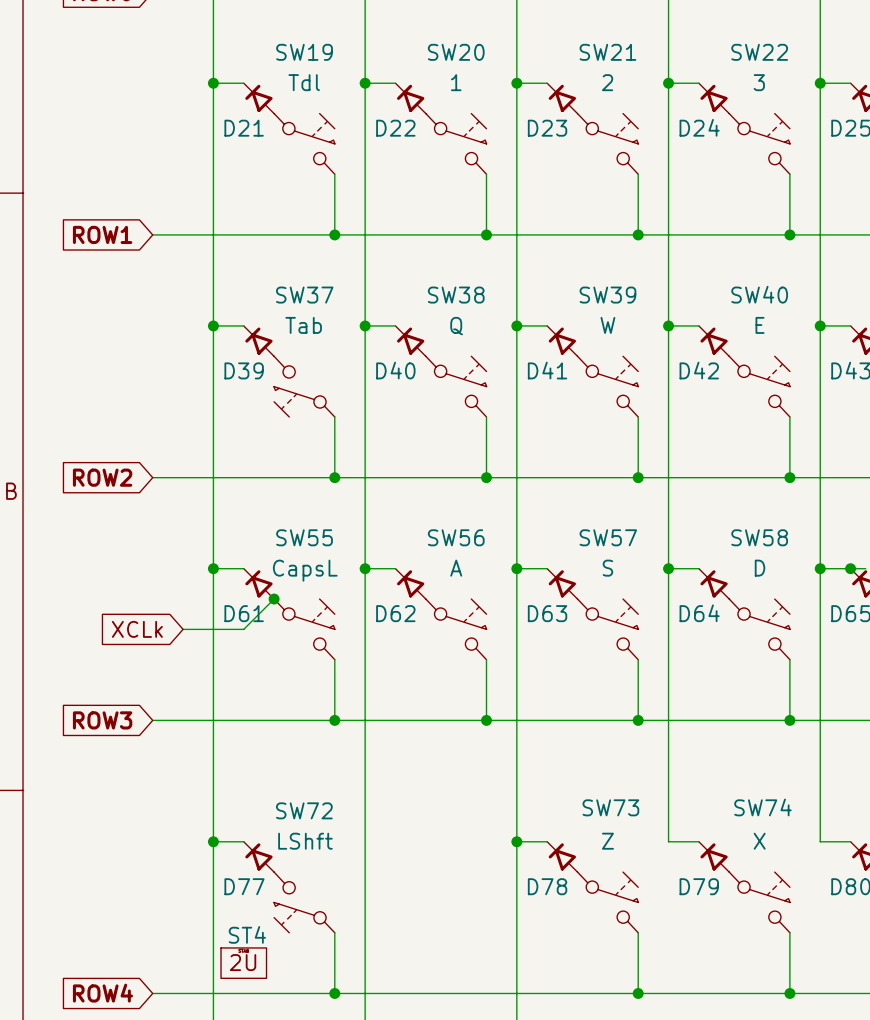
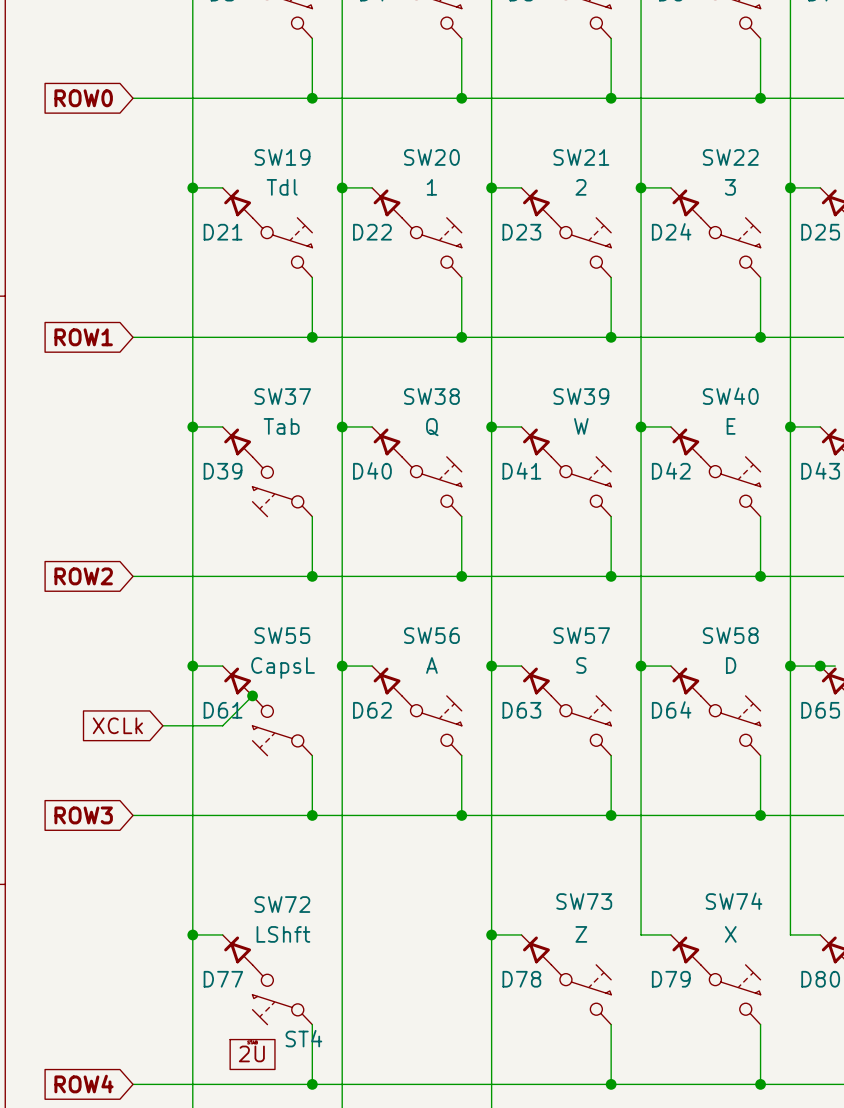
SW55 rotation: 0° (304, 629) -> 180° (282, 725)
ST4 name position: ST4 (247, 934) -> ST4 (303, 1038)
ST4 position: (243, 963) -> (252, 1054)

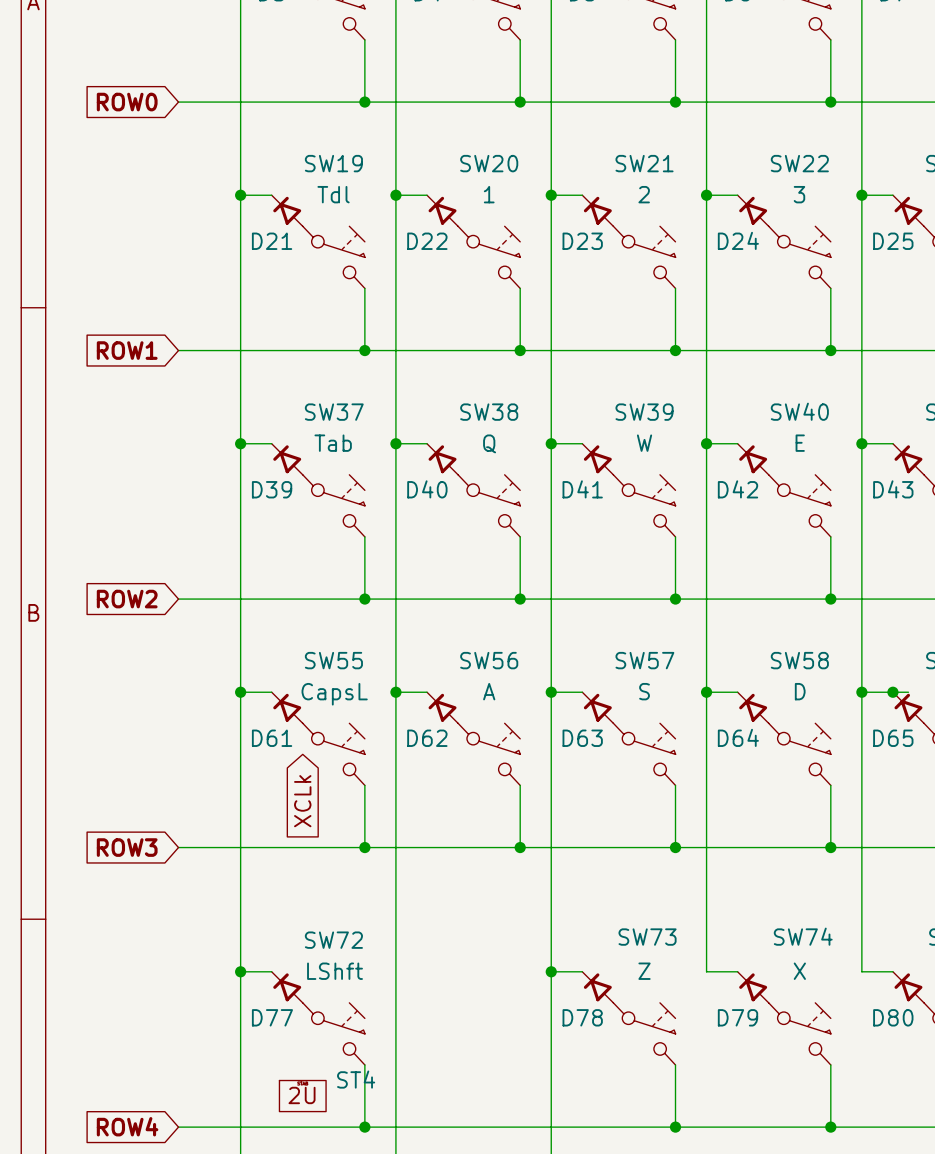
SW37 rotation: 0° (282, 486) -> 180° (333, 505)
wire: (252, 695) (222, 725) (162, 725) -> none
junction: (252, 695) -> none
global label rotation: 0° (117, 725) -> 90° counterclockwise (302, 801)
global label position: XCLk (117, 725) -> XCLk (302, 801)
SW55 rotation: 0° (282, 725) -> 180° (333, 754)
SW72 rotation: 0° (282, 994) -> 180° (333, 1033)

